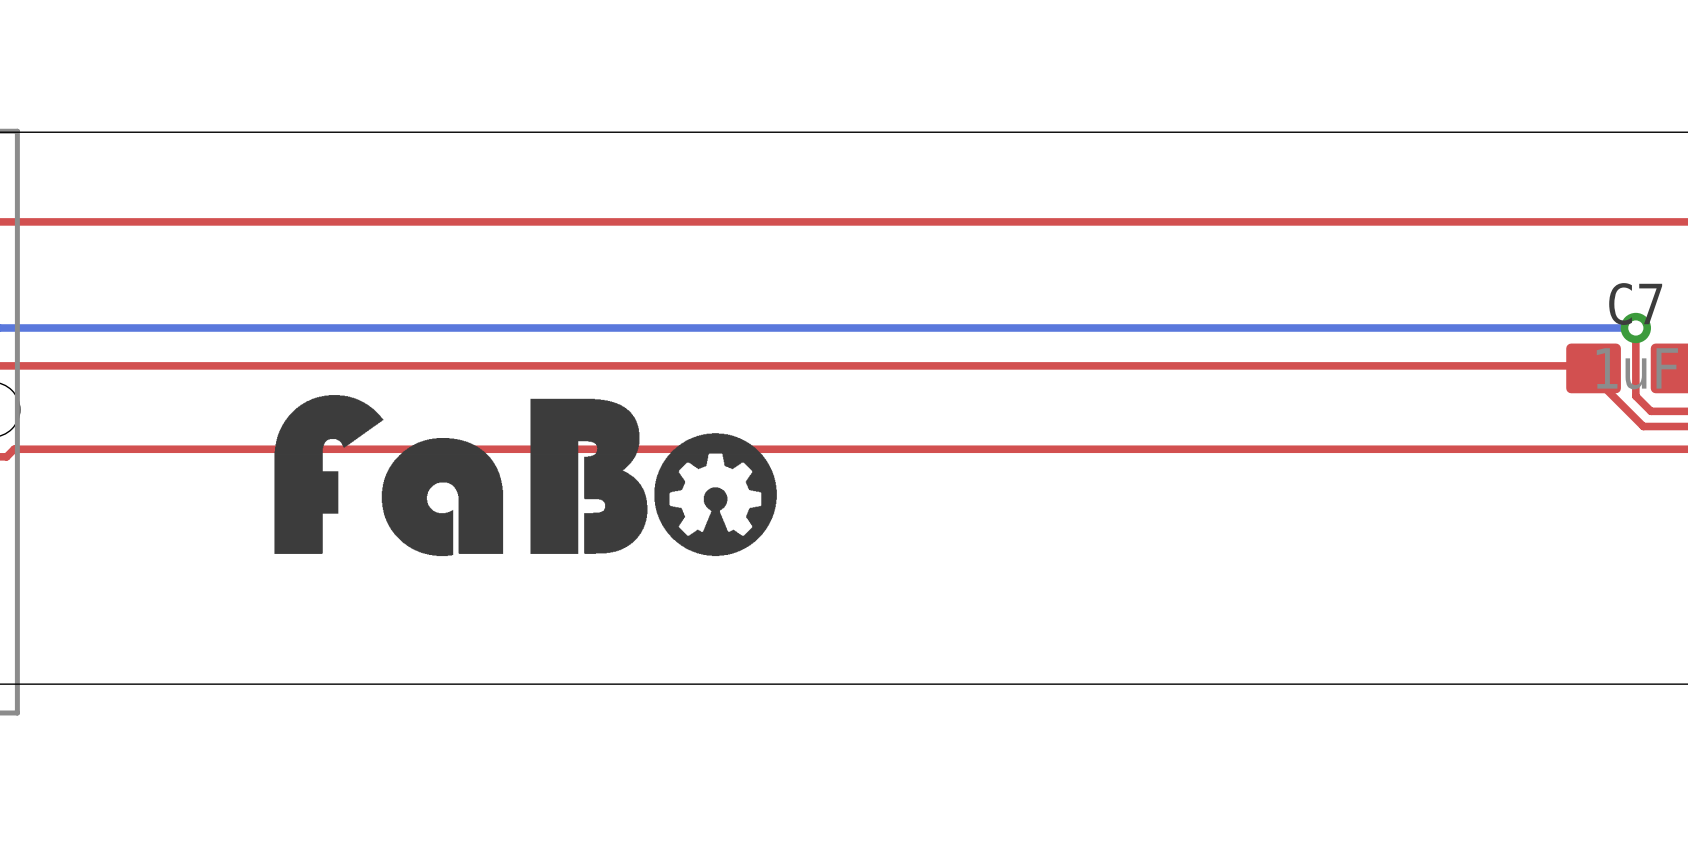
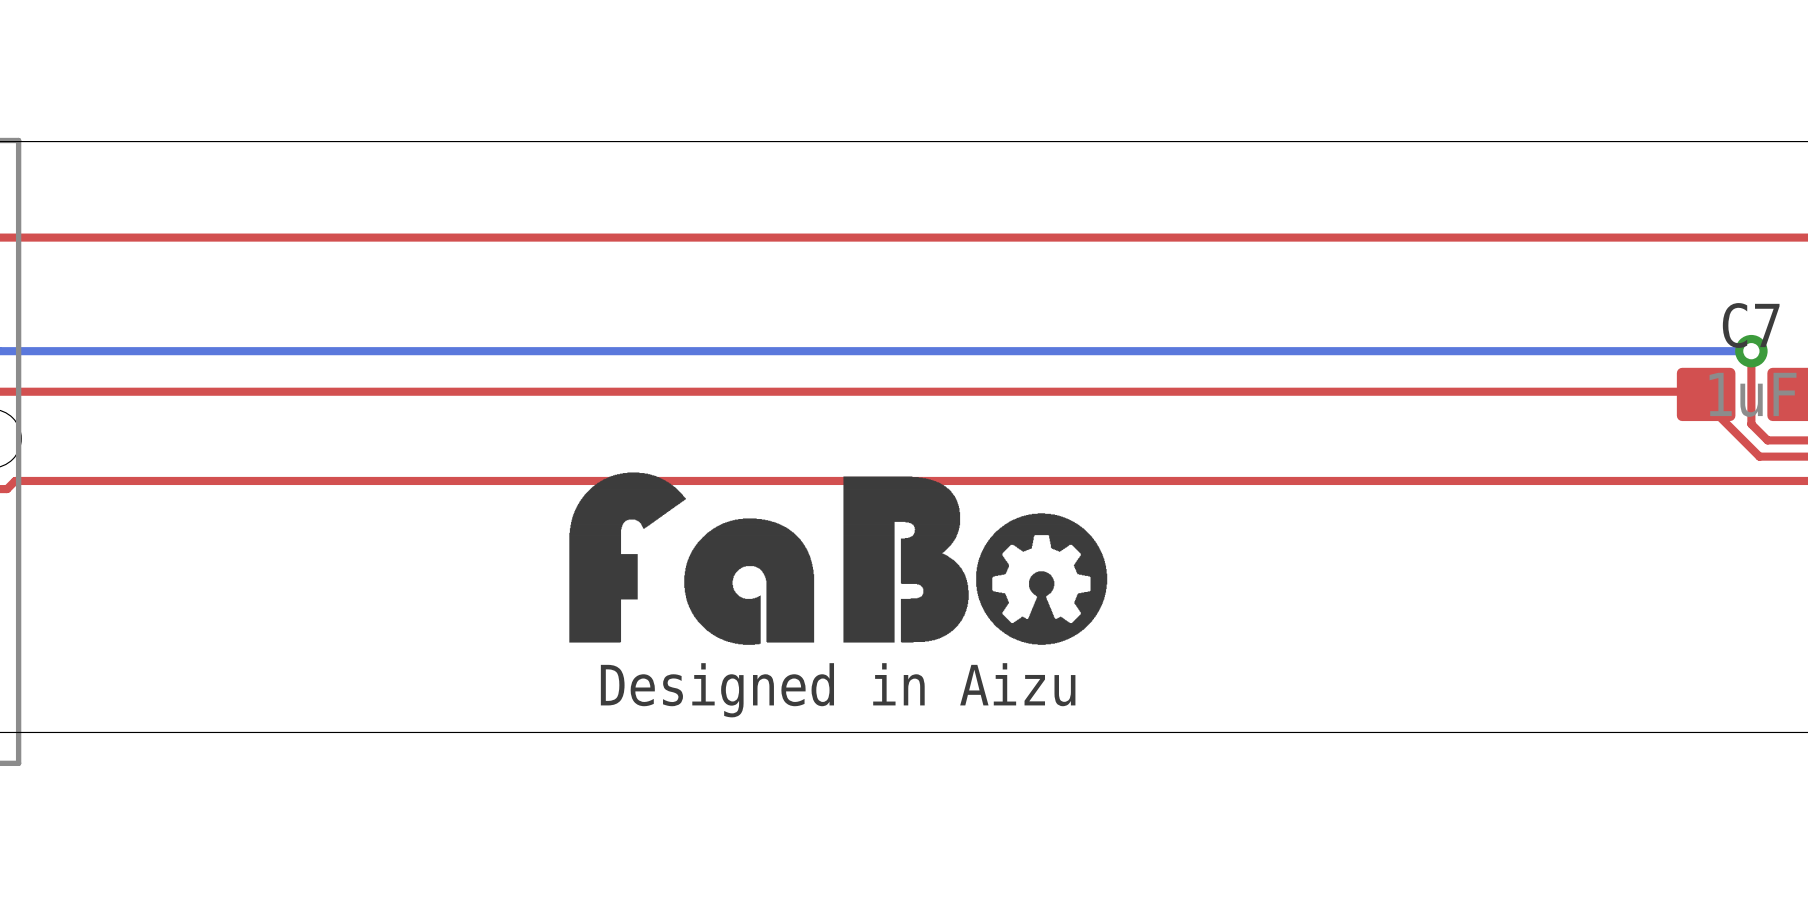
drawing position: (525, 475) -> (838, 558)
text: none -> Designed in Aizu (838, 690)

